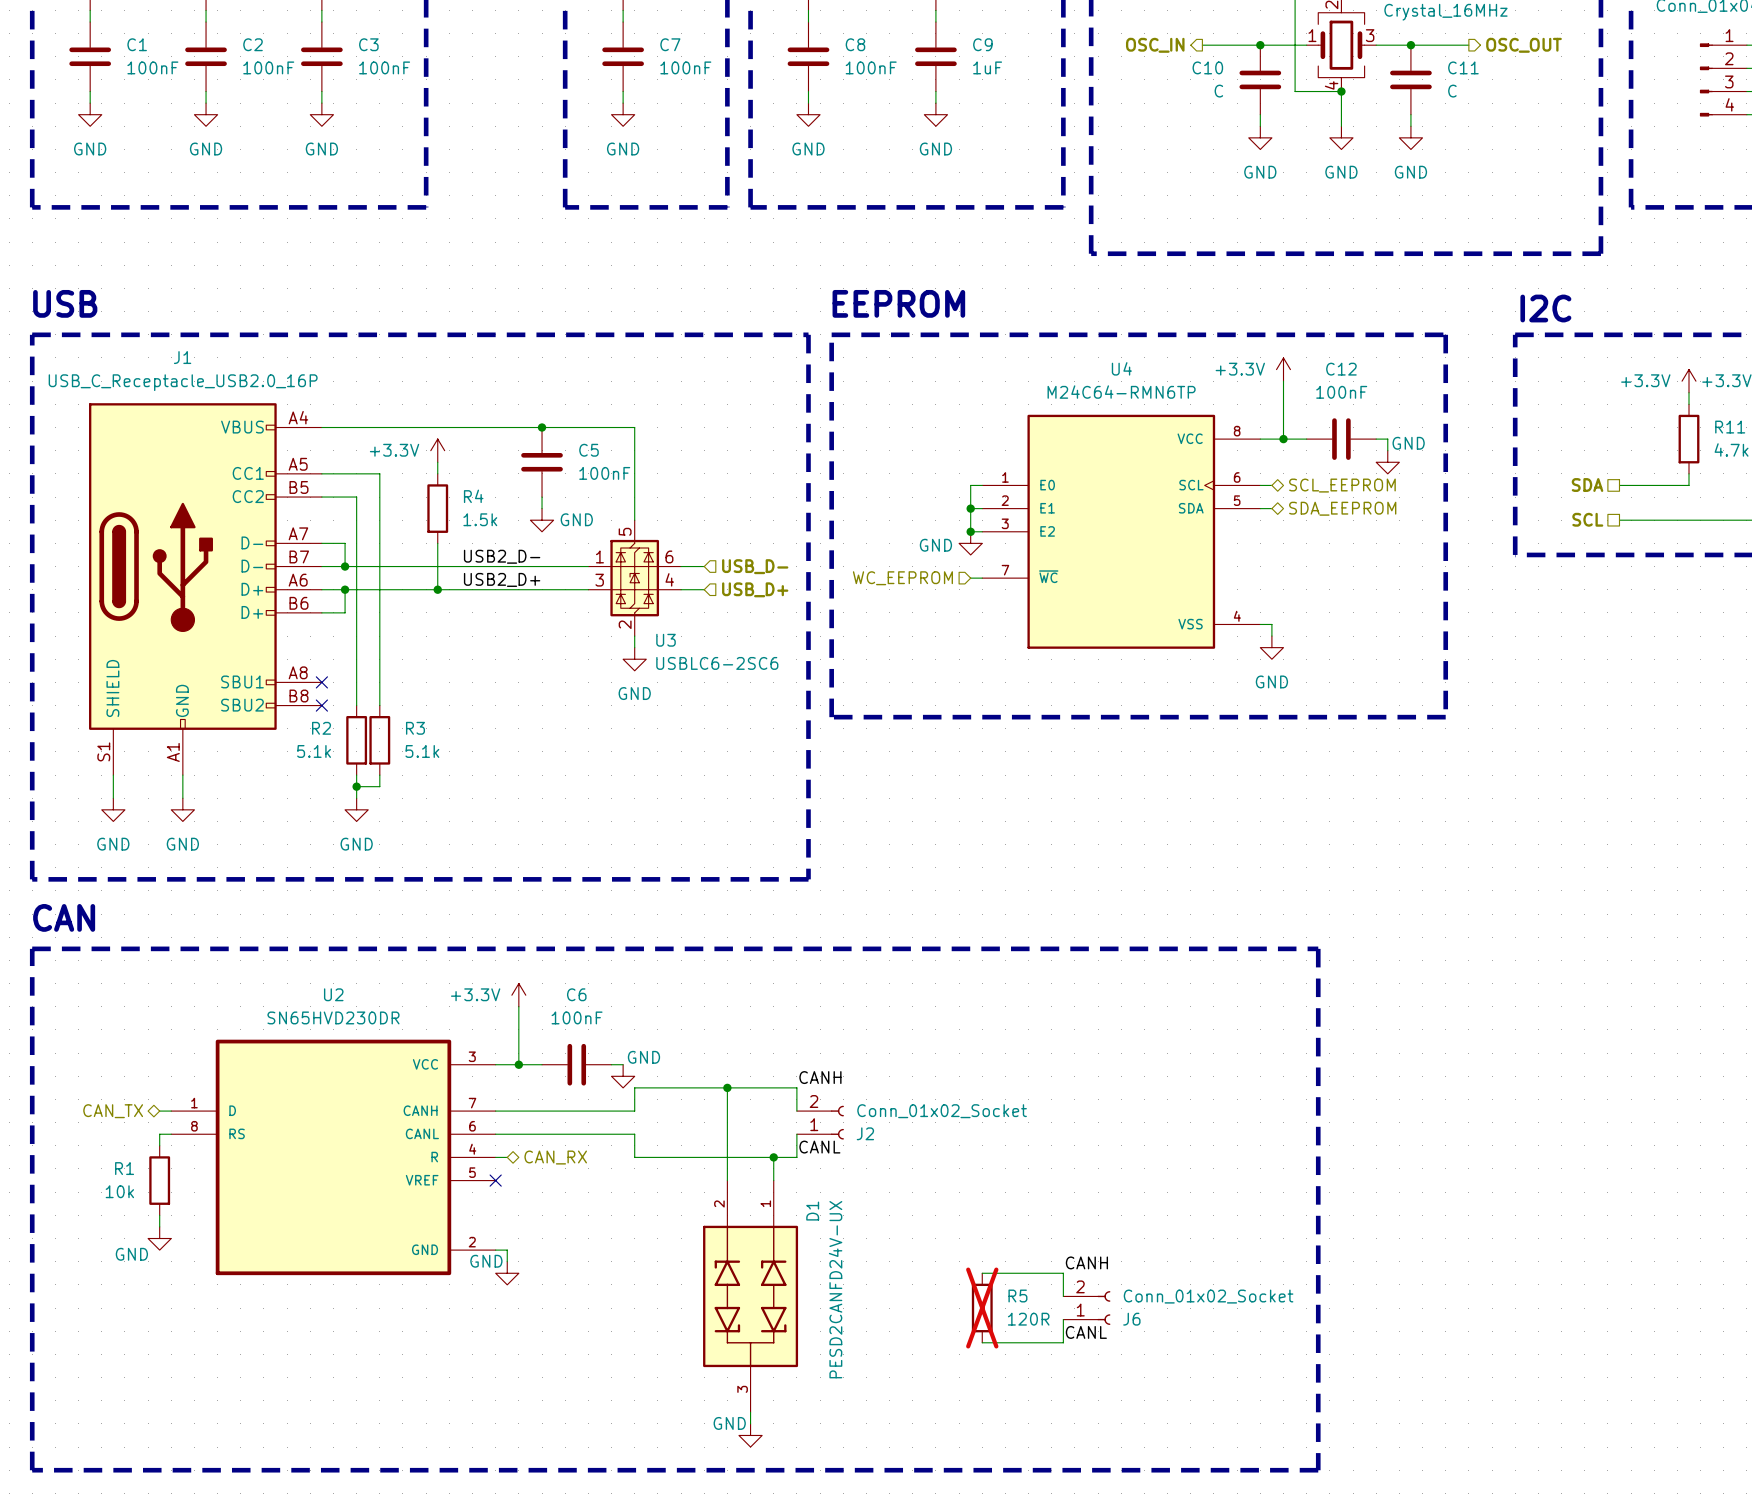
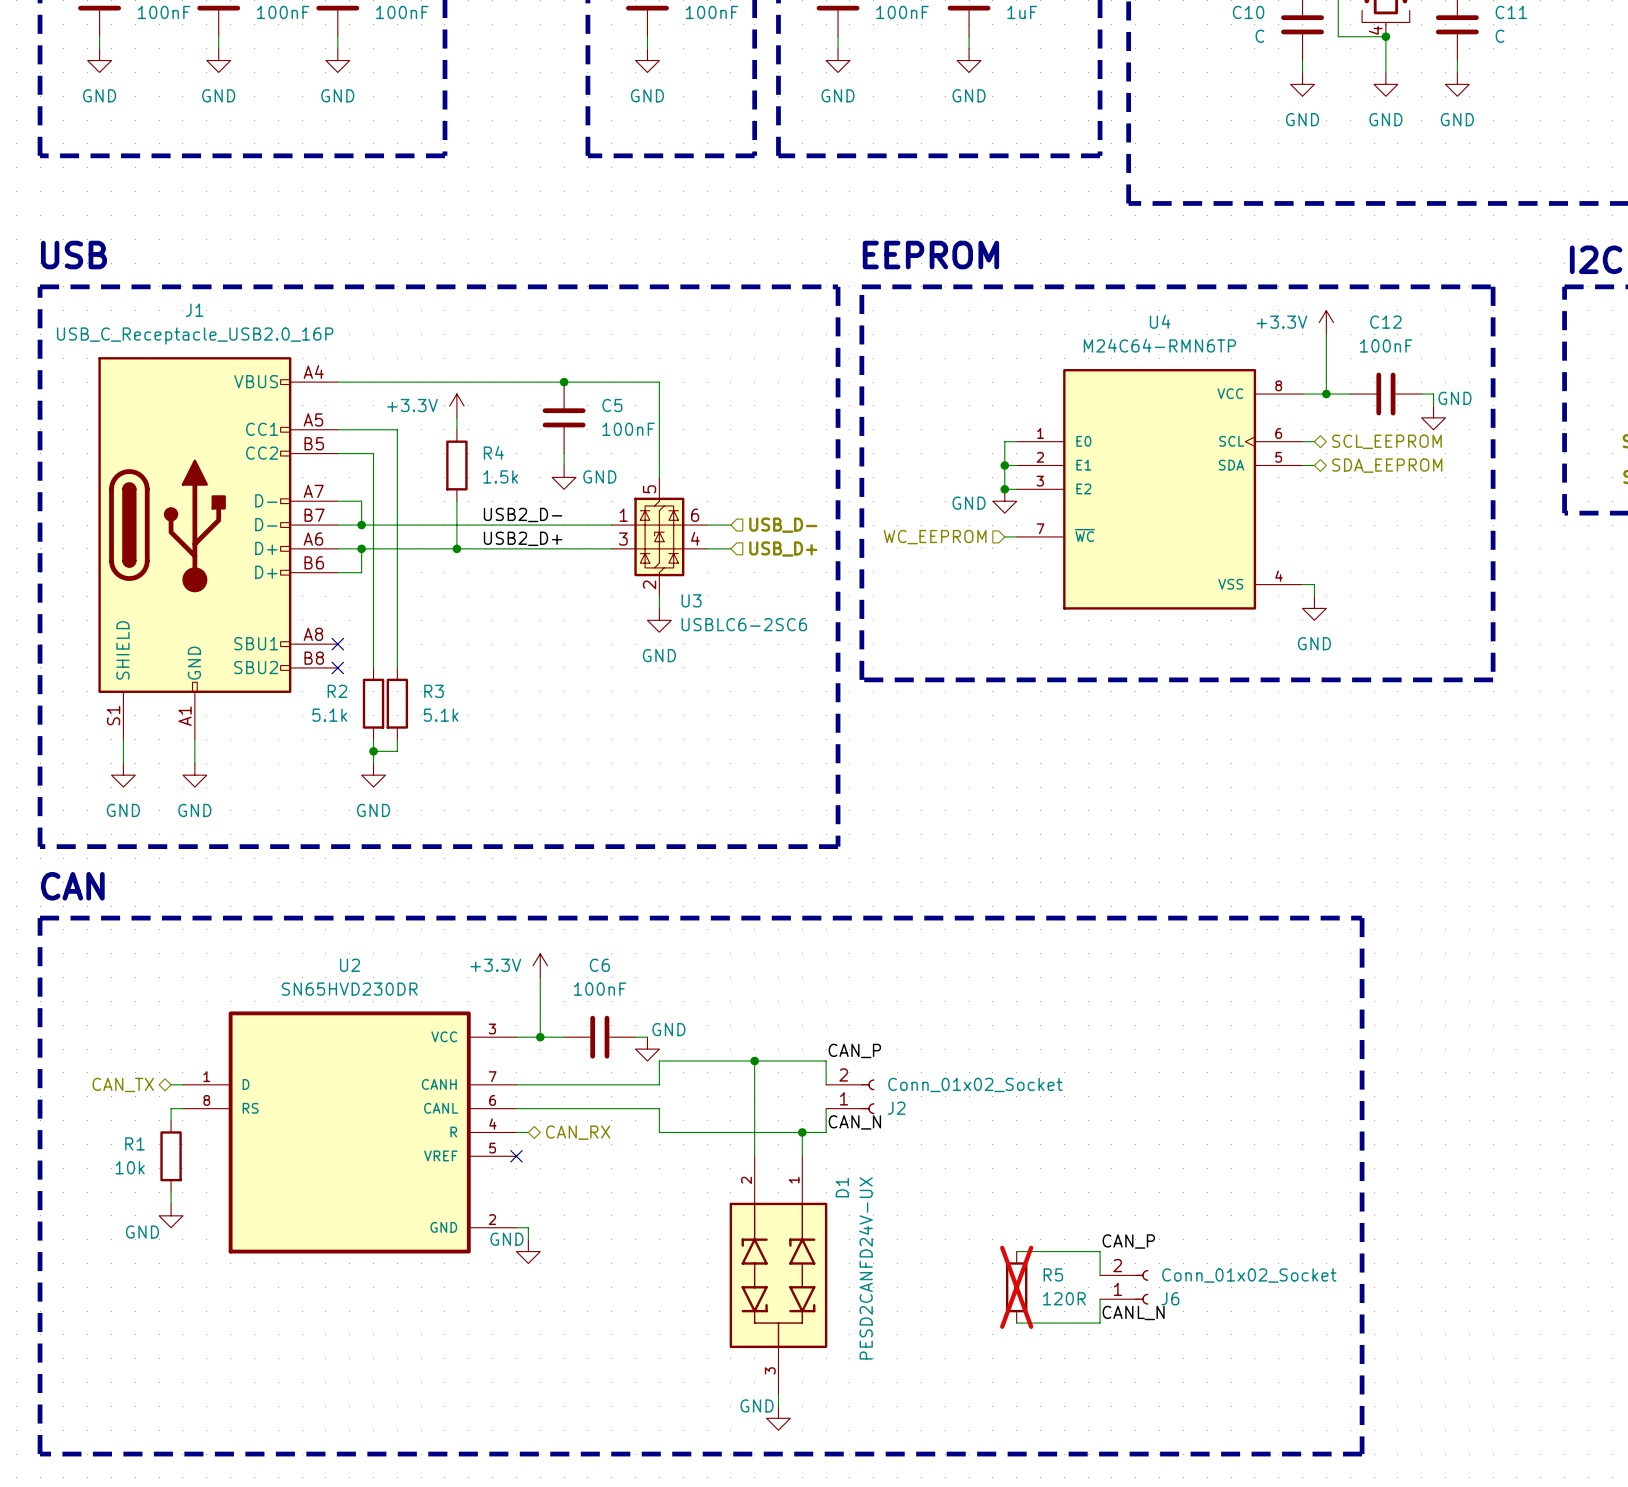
label: CANH (820, 1077) -> CAN_P (854, 1050)
label: CANL (819, 1147) -> CAN_N (854, 1122)
label: CANH (1086, 1262) -> CAN_P (1128, 1241)
label: CANL (1086, 1332) -> CANL_N (1133, 1312)

